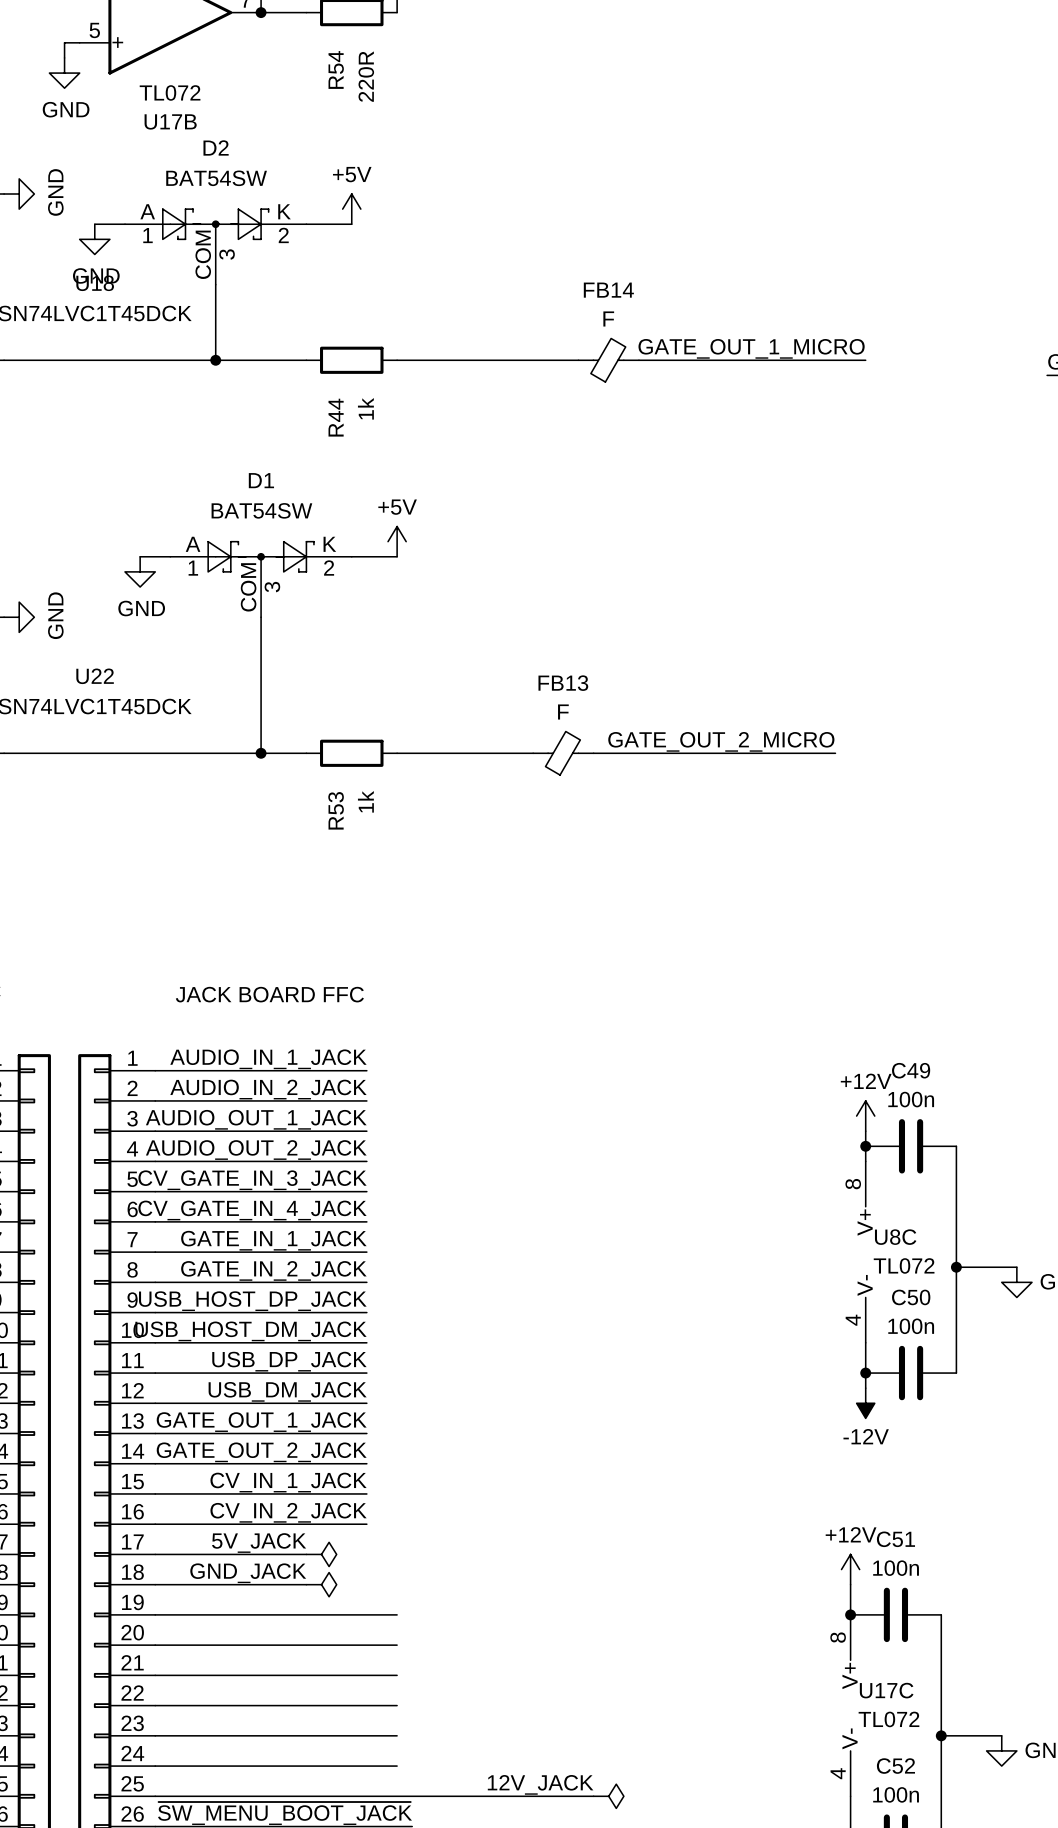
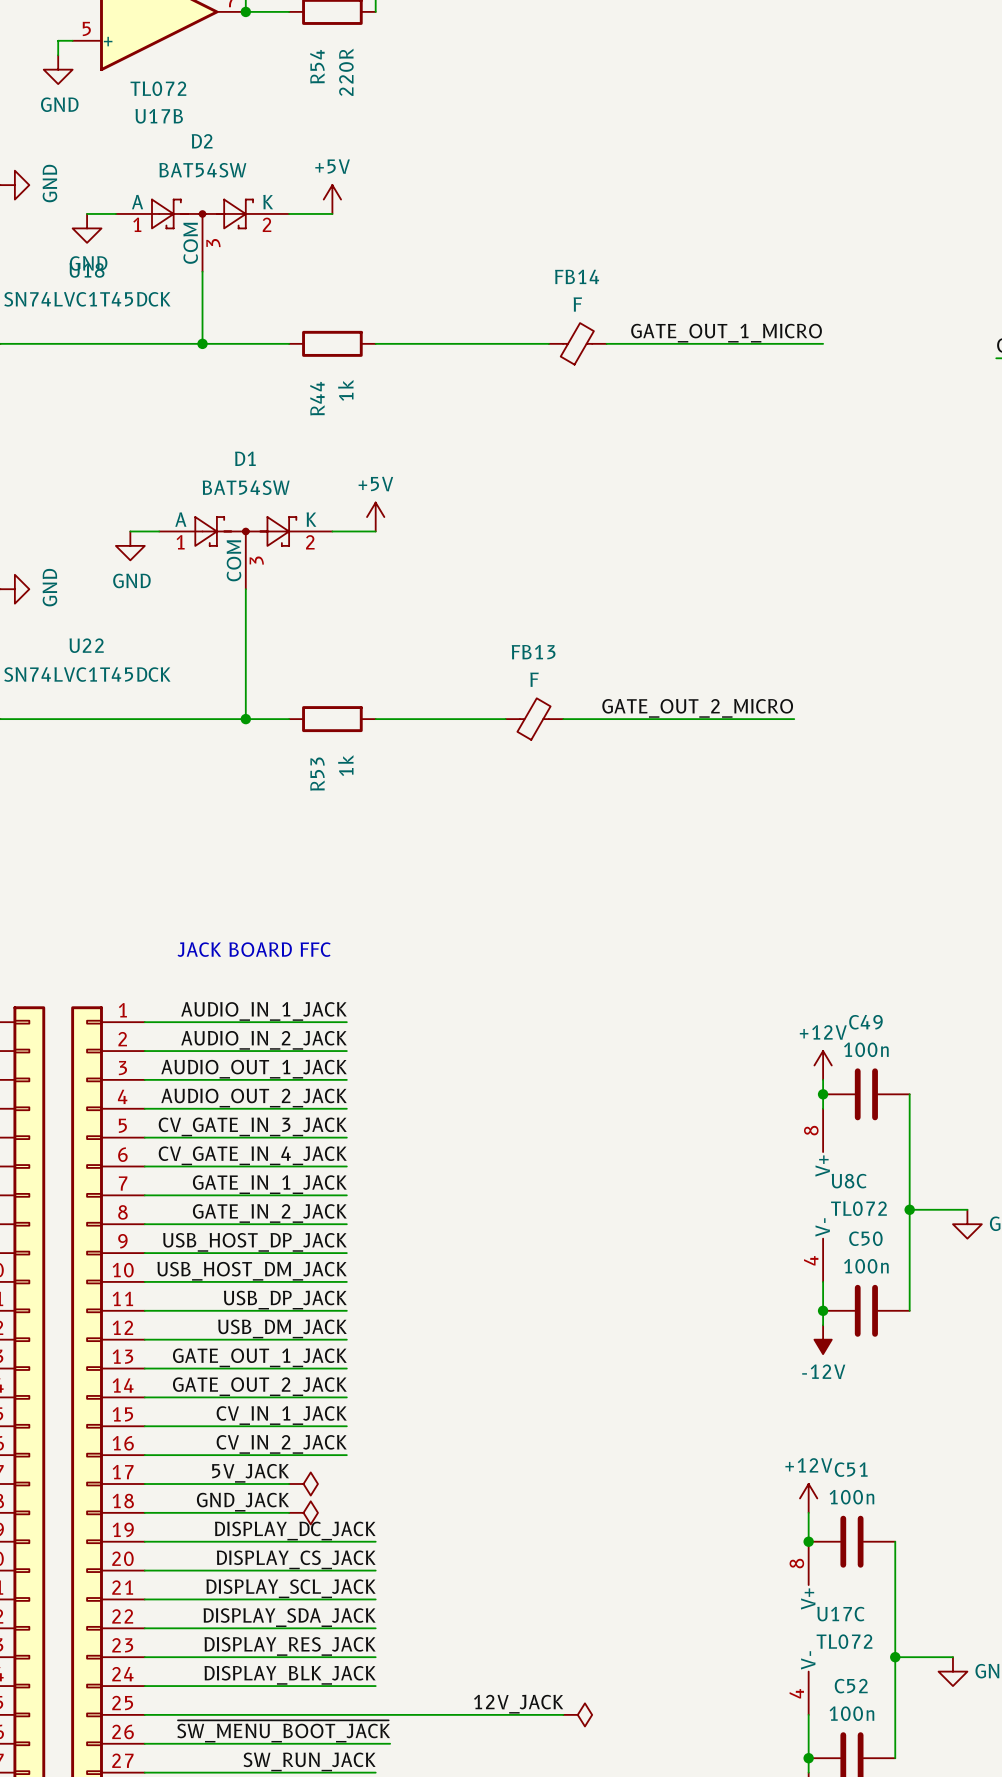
label: none -> DISPLAY_DC_JACK (295, 1531)
label: none -> DISPLAY_CS_JACK (296, 1559)
label: none -> DISPLAY_SCL_JACK (291, 1588)
label: none -> DISPLAY_SDA_JACK (289, 1617)
label: none -> DISPLAY_RES_JACK (290, 1646)
label: none -> DISPLAY_BLK_JACK (290, 1675)

